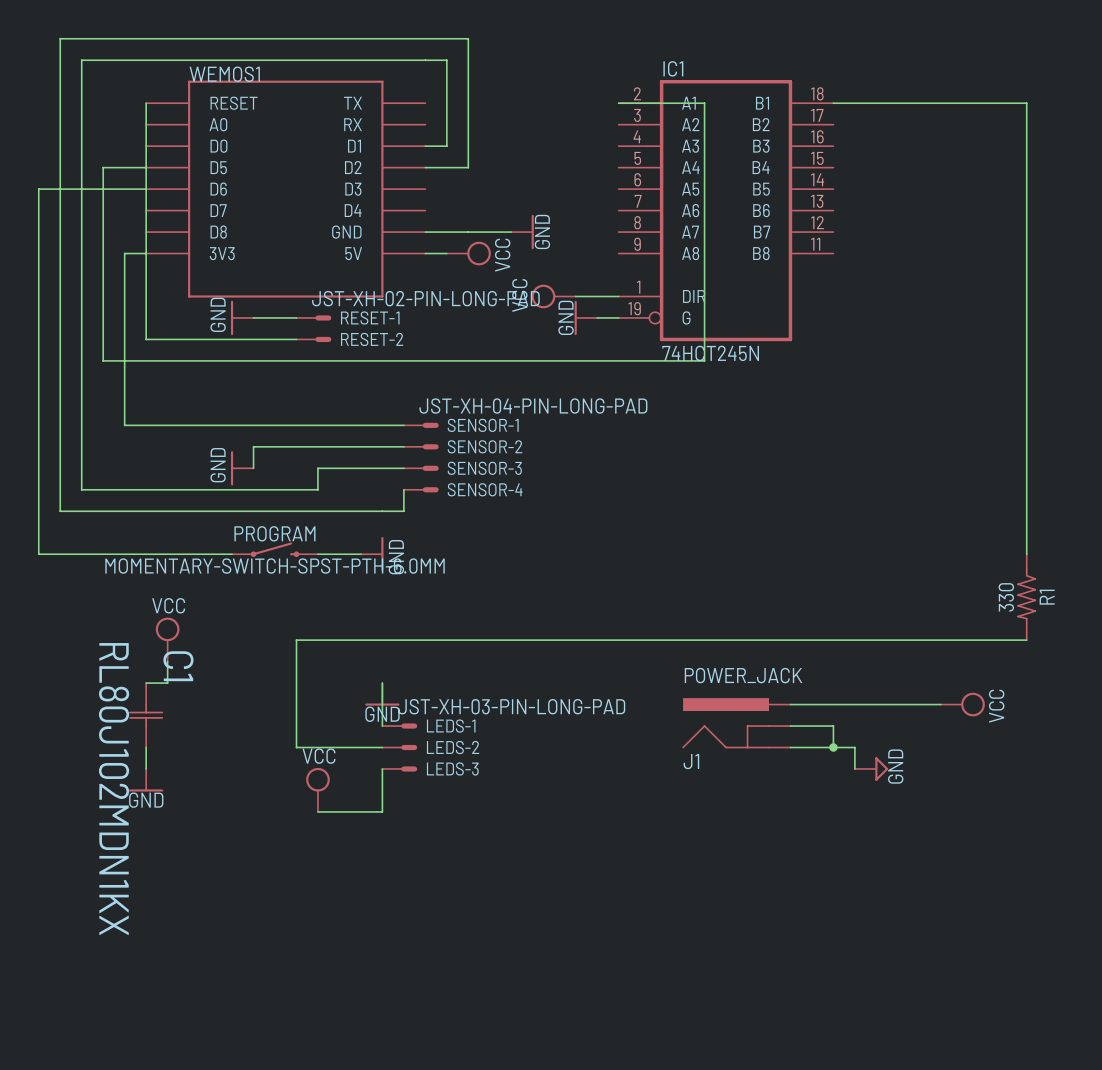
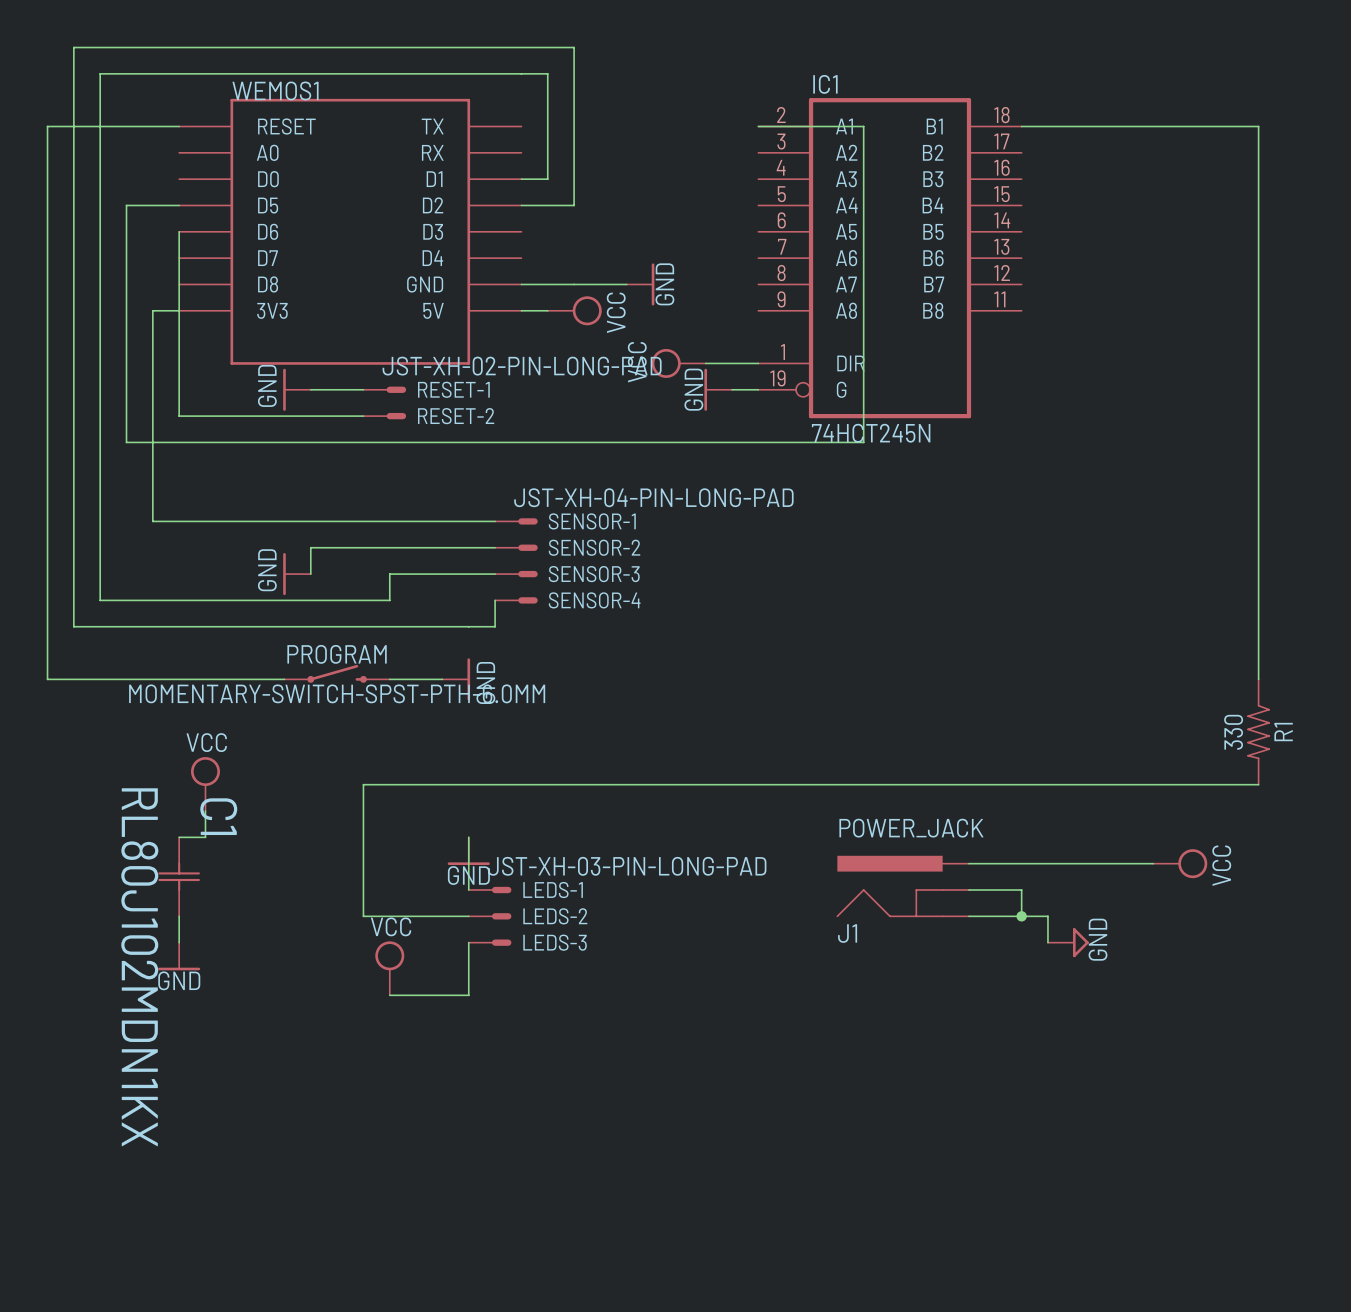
wire: (146, 103) (146, 189) (38, 189) -> (179, 126) (47, 126) (47, 231)

